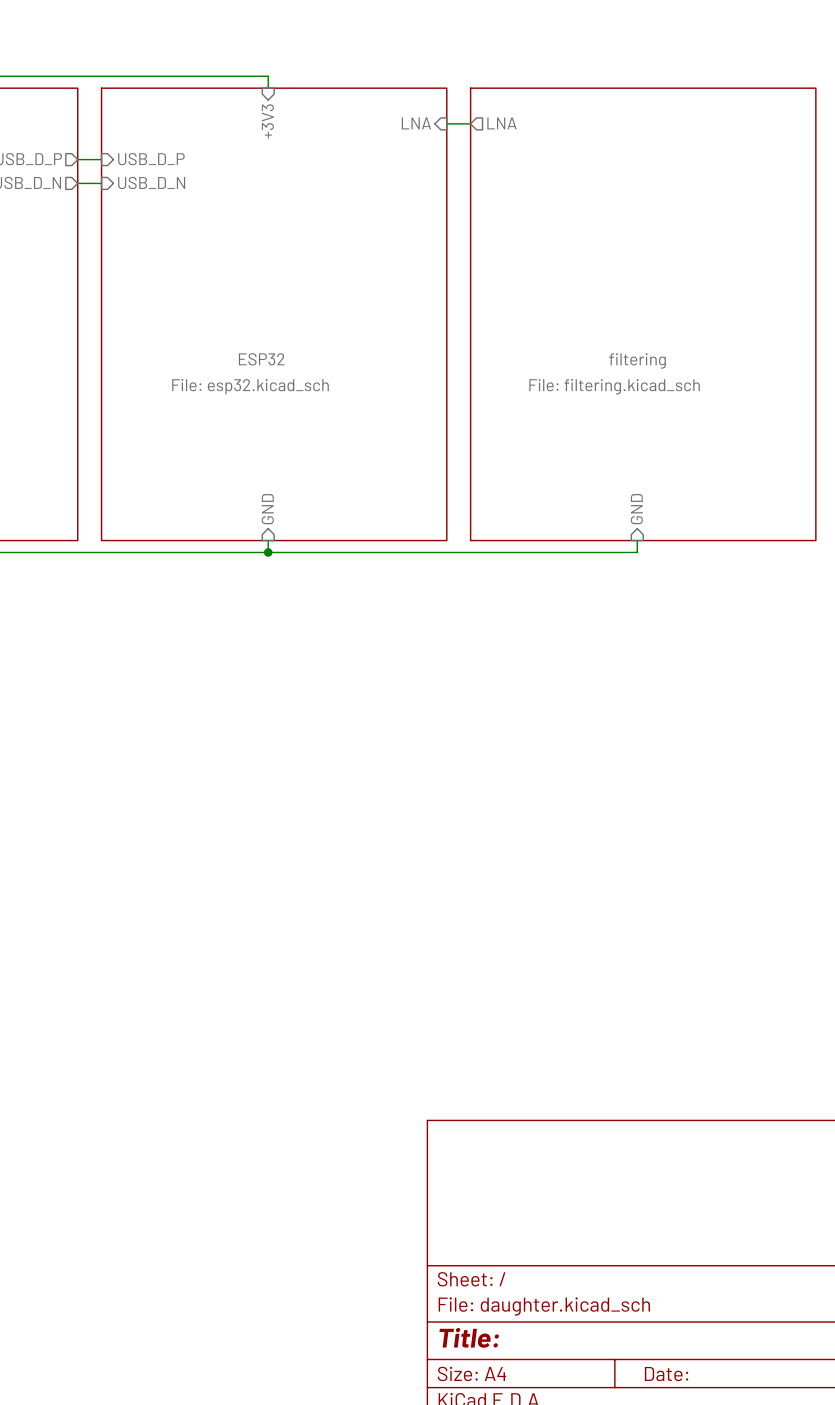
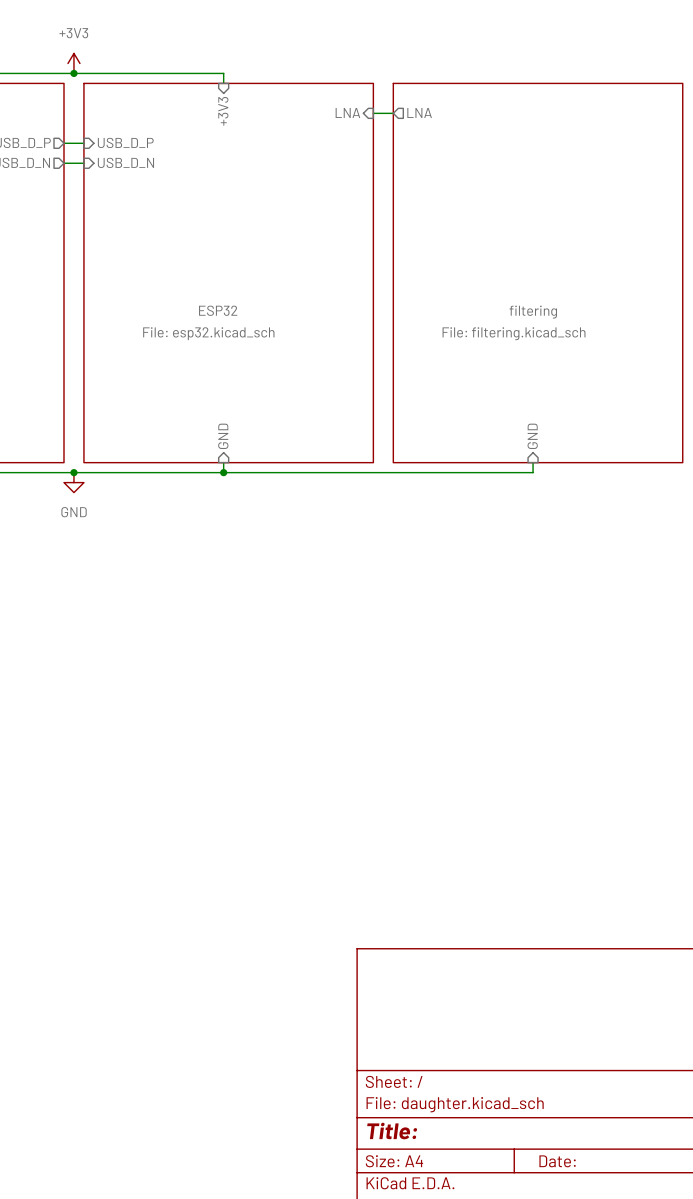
power symbol: none -> +3V3 (73, 63)
junction: none -> (73, 73)
junction: none -> (73, 472)
power symbol: none -> GND (73, 482)

